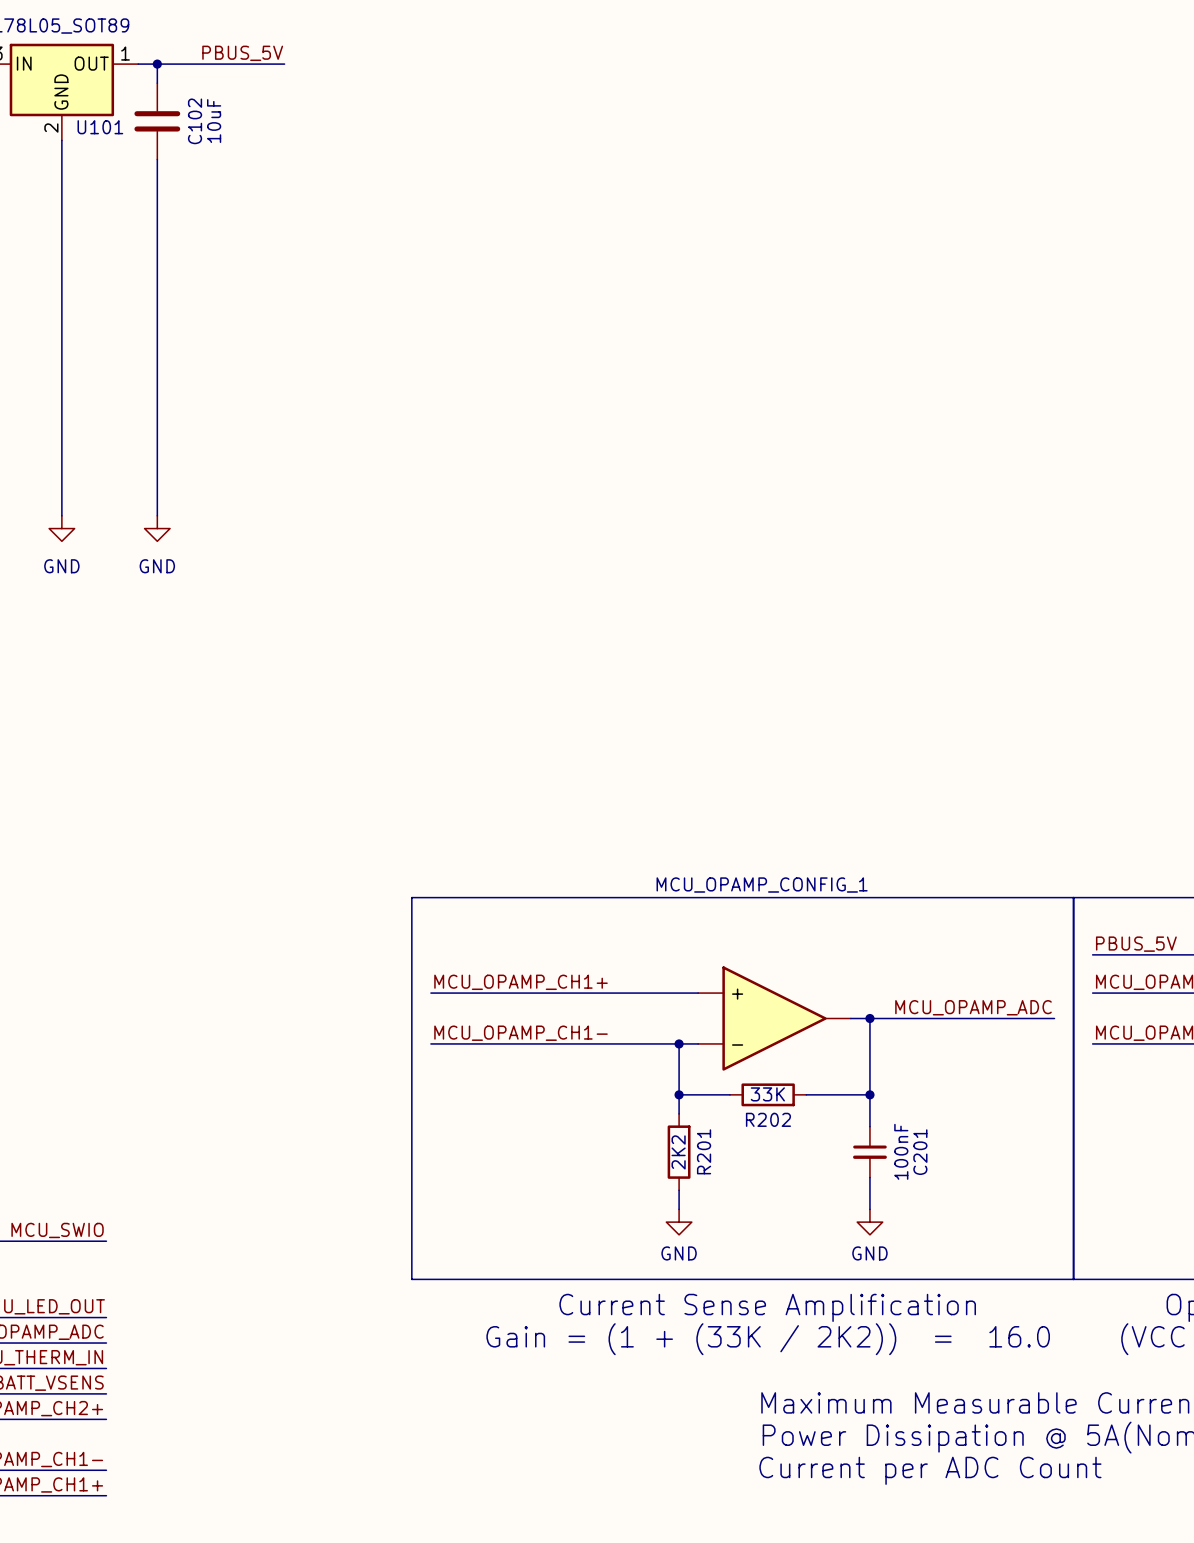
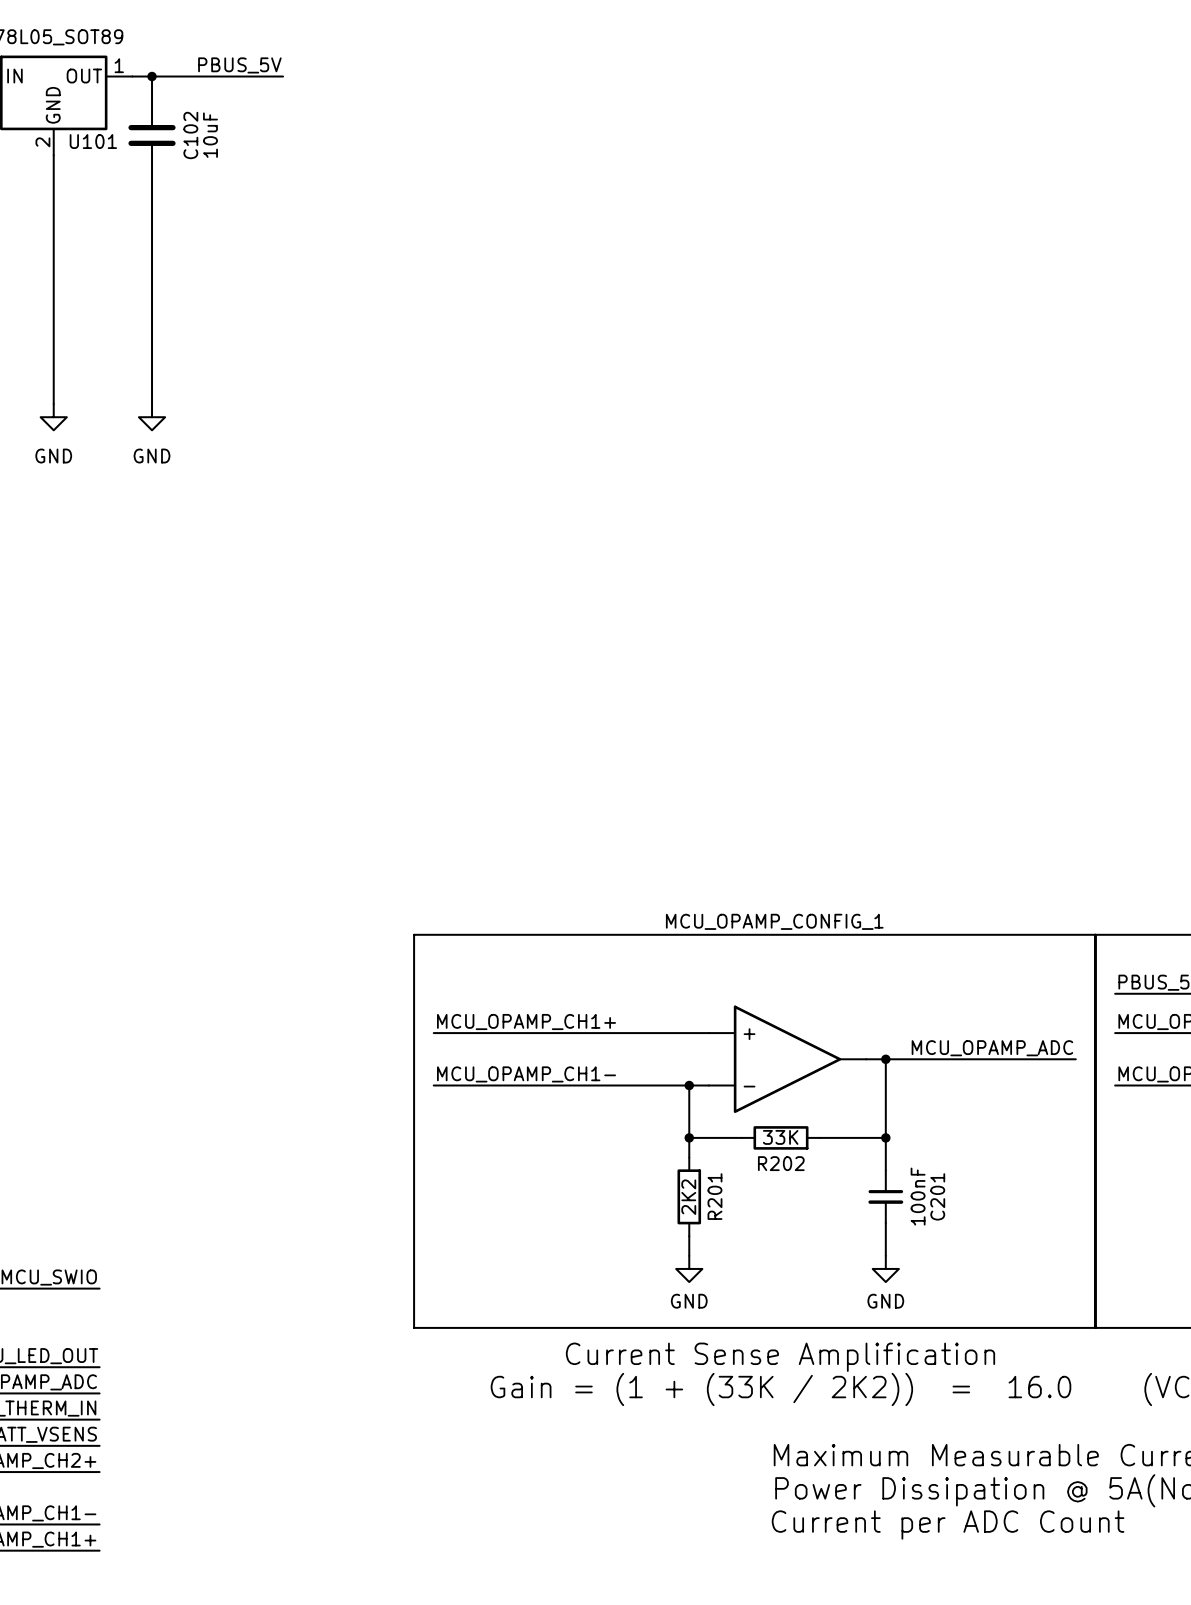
wire: (61, 382) (61, 515) -> none
wire: (157, 382) (157, 515) -> none
power symbol: none -> GND (53, 417)
power symbol: none -> GND (152, 417)
power symbol: GND (61, 528) -> none
power symbol: GND (157, 528) -> none

